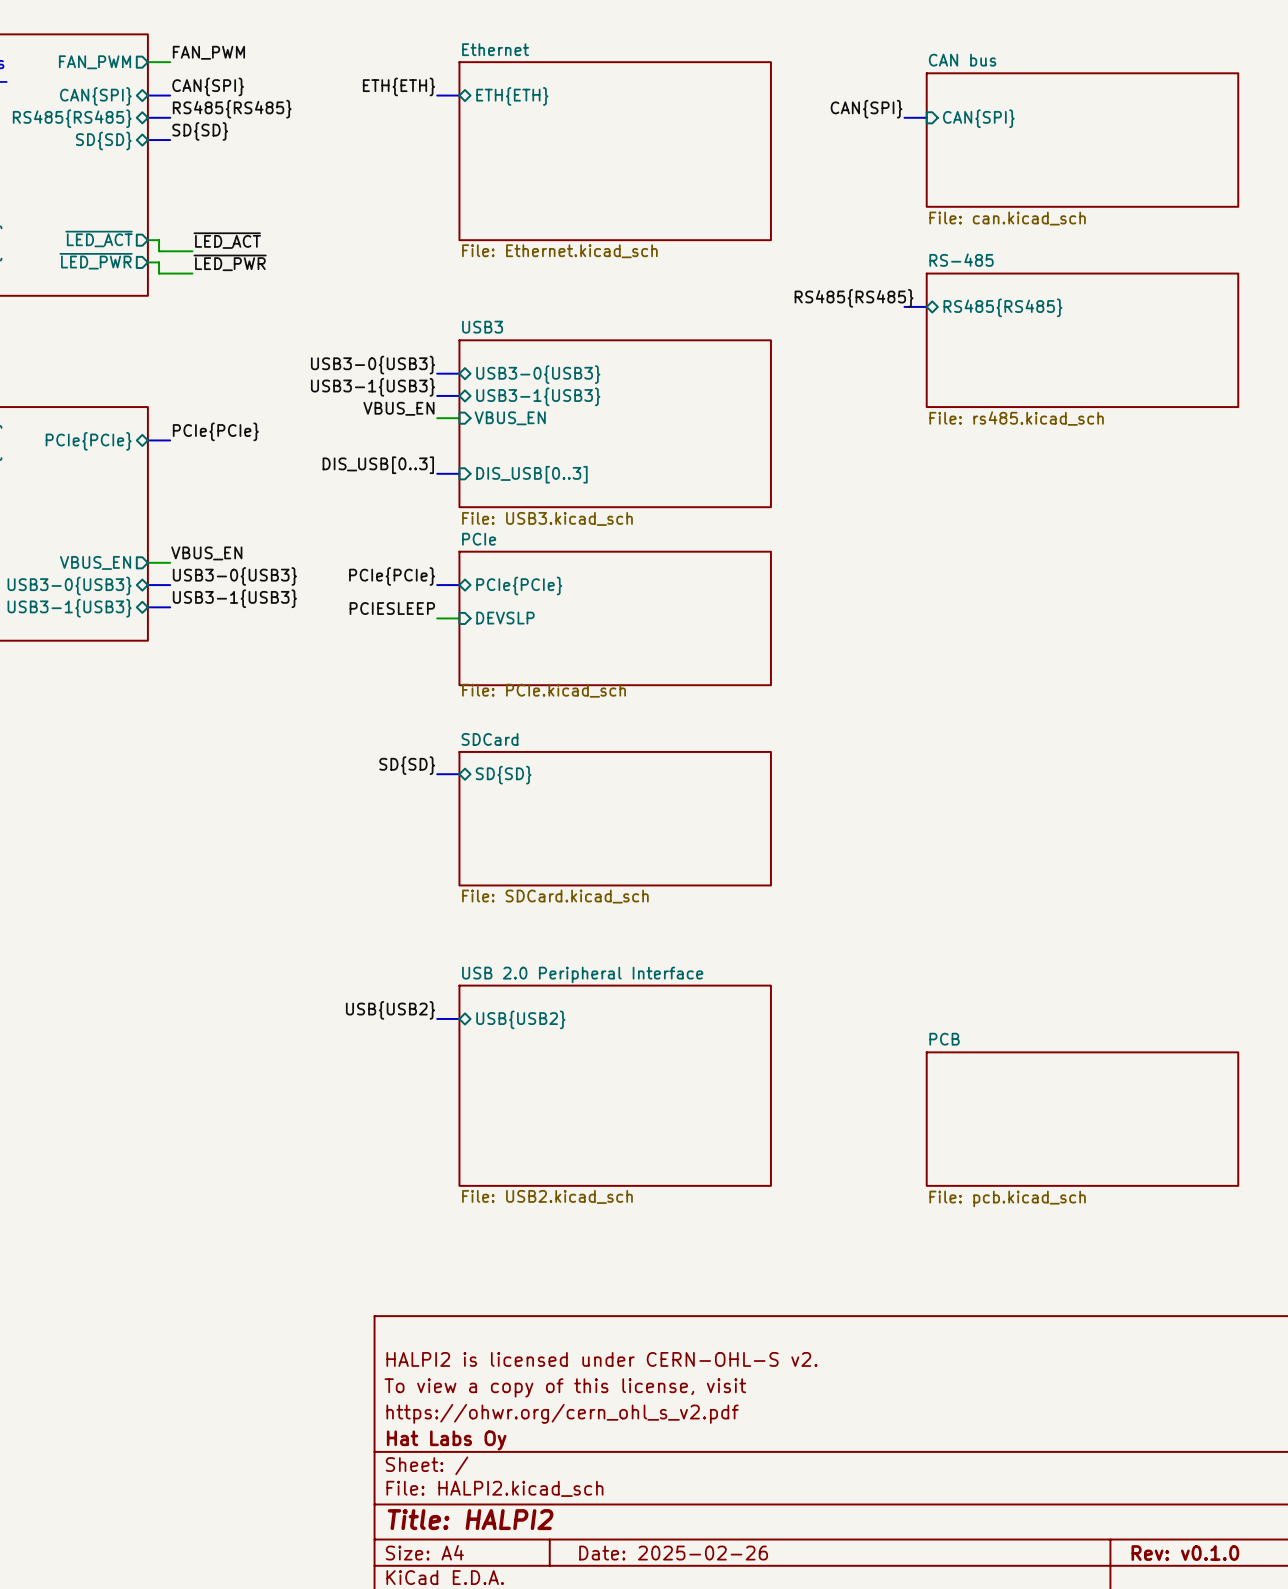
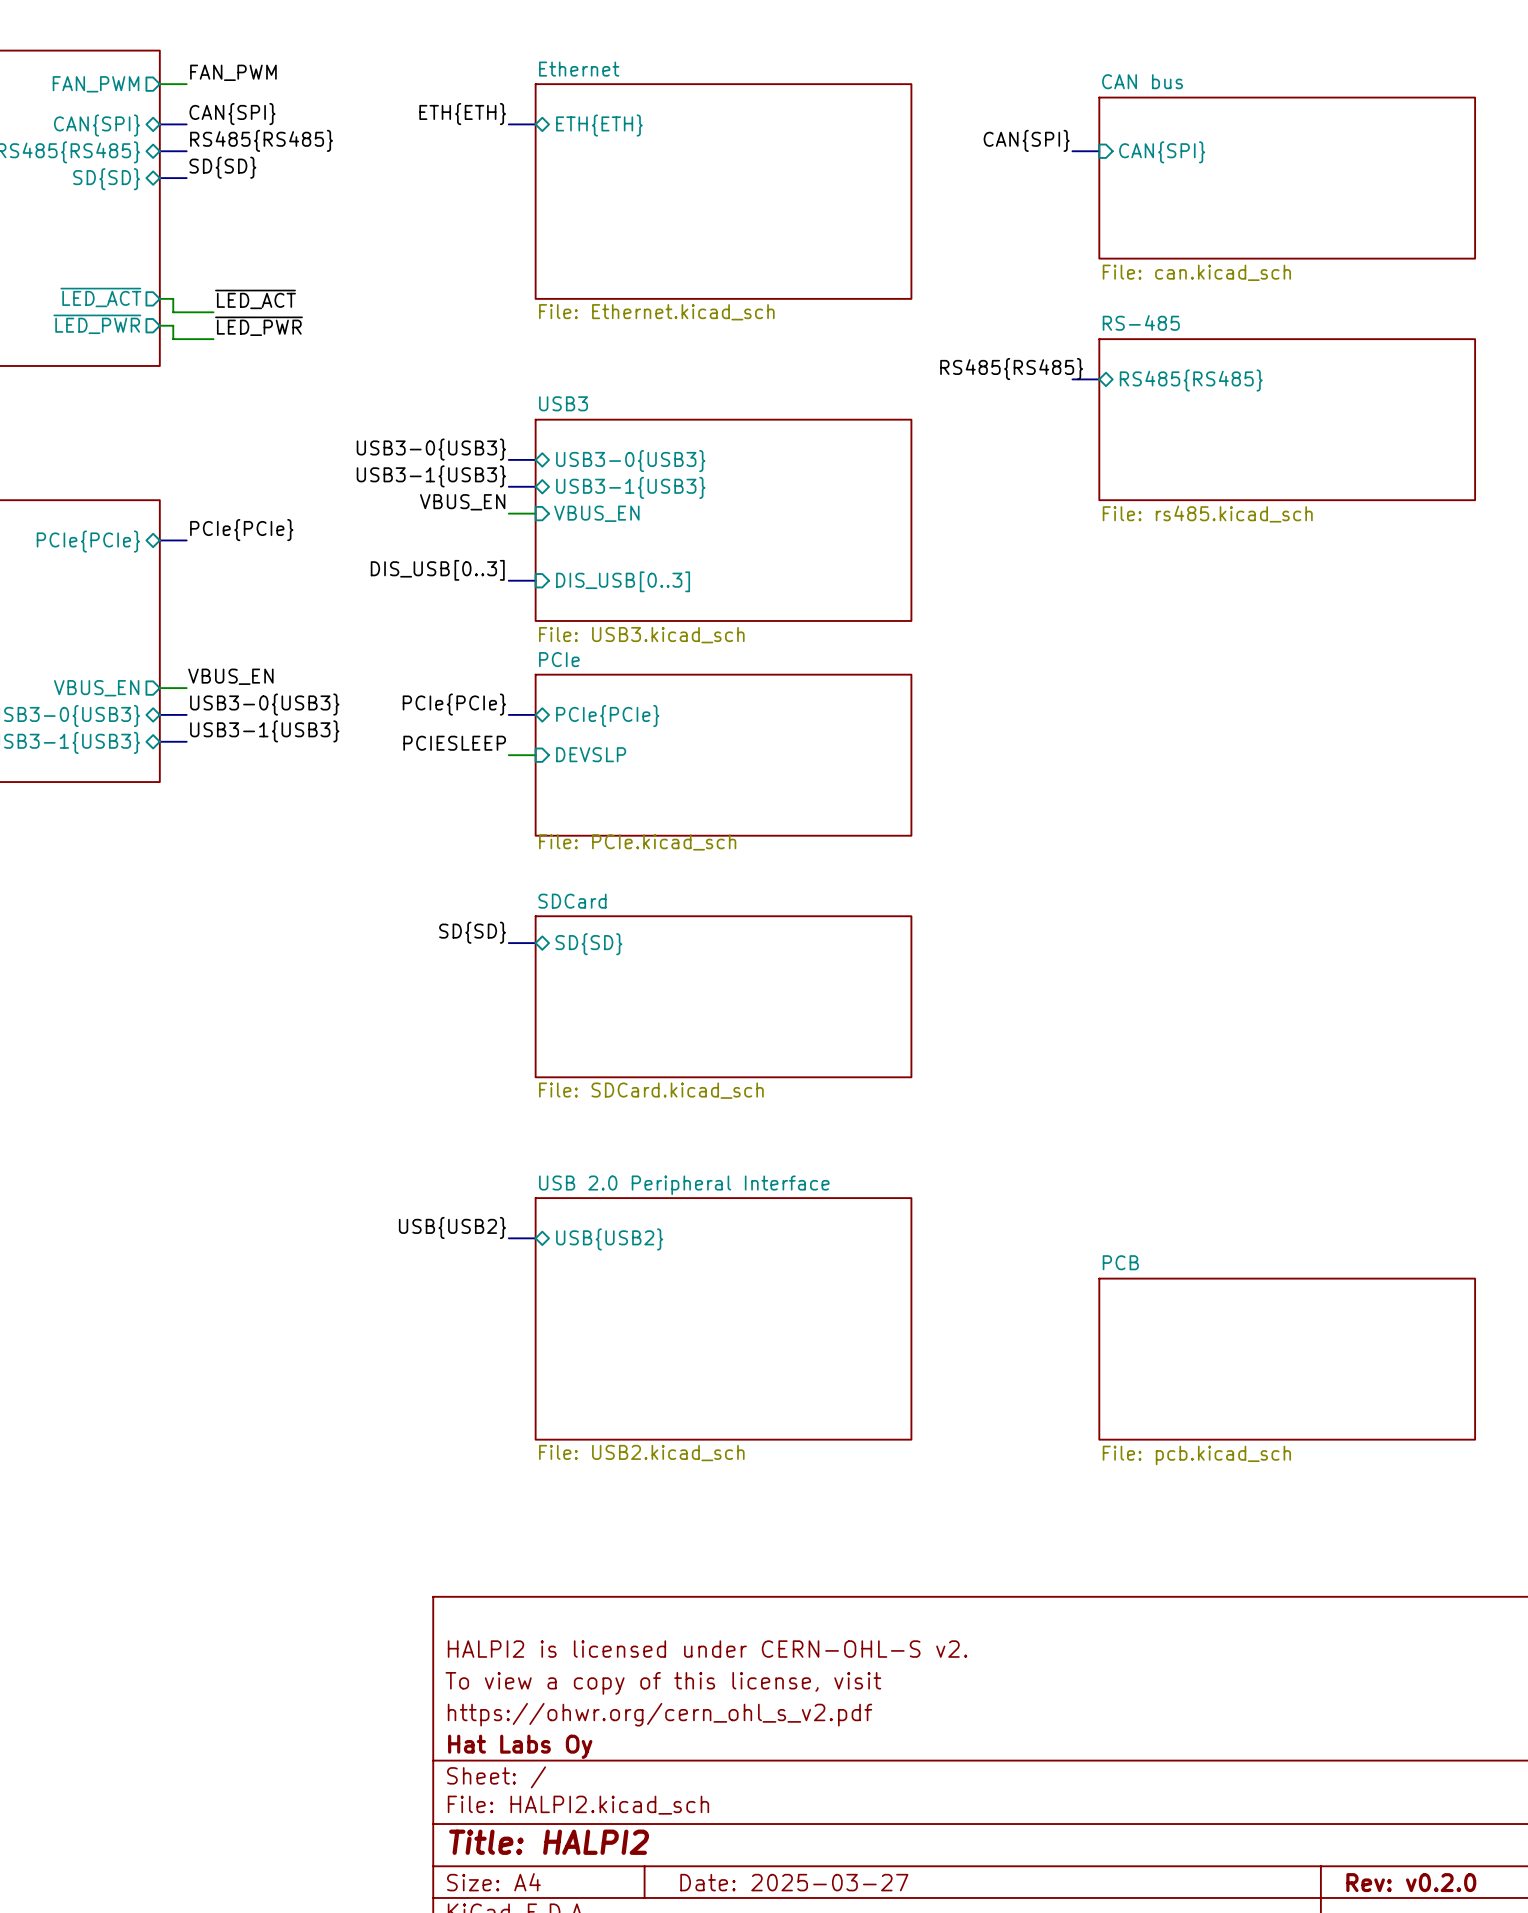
title block: Date: 2025-02-26 (673, 1553) -> Date: 2025-03-27 (794, 1882)
title block: Rev: v0.1.0 (1185, 1553) -> Rev: v0.2.0 (1411, 1882)

